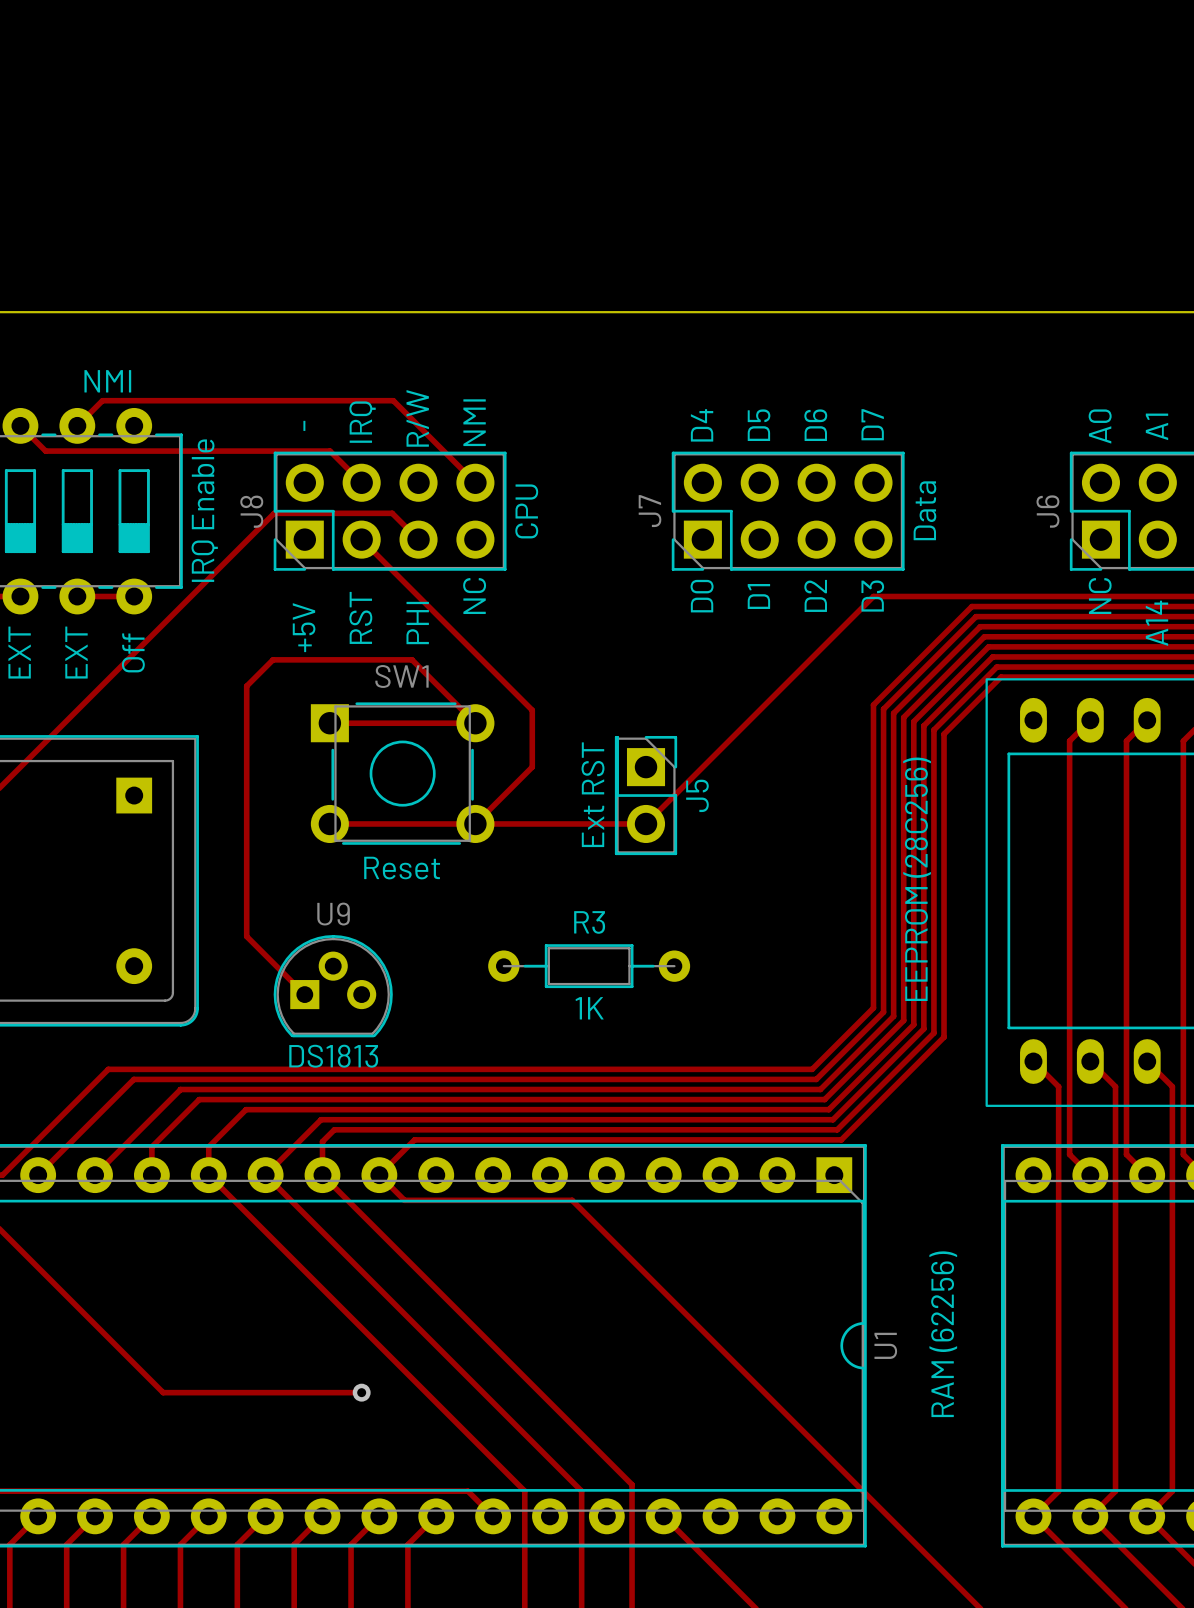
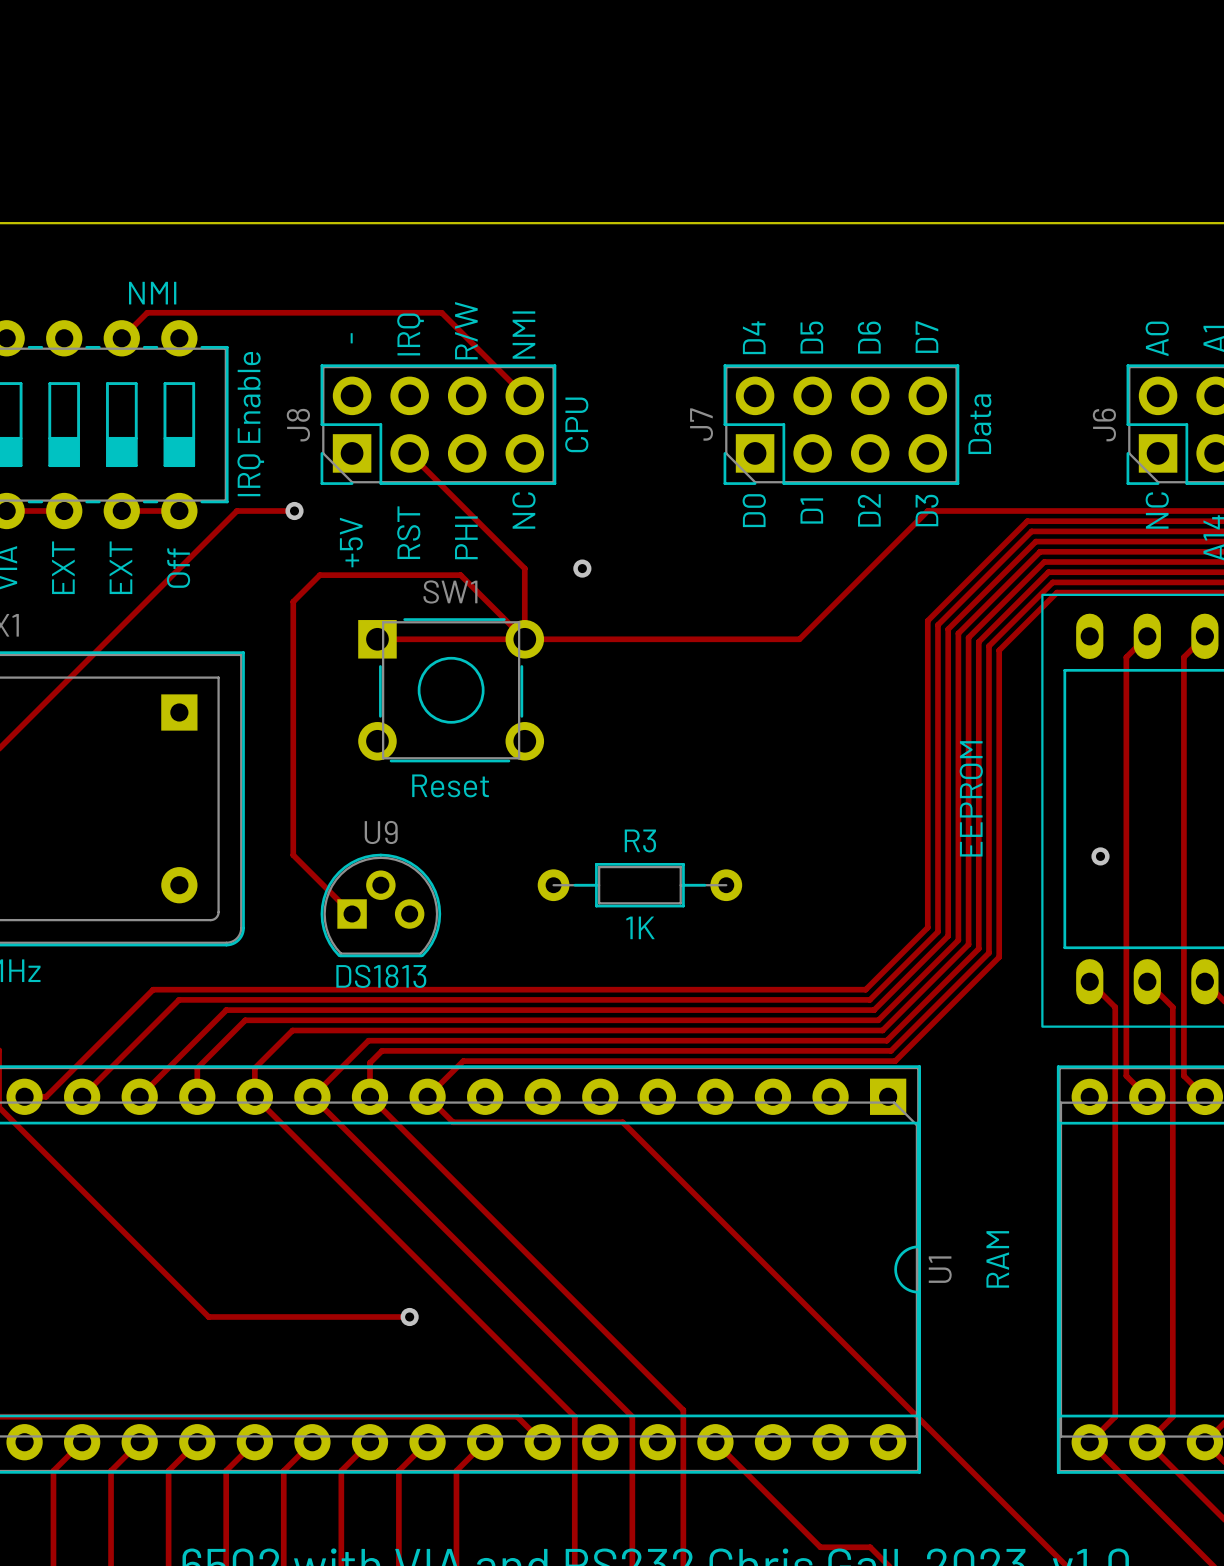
track: (20, 425) (45, 451) (329, 451) (361, 482) -> none
track: (418, 539) (392, 513) (274, 513) (191, 596) -> (294, 511) (236, 511)
via: none -> (294, 511)
track: (475, 653) (532, 710) (532, 767) (475, 823) -> none
via: none -> (582, 568)
track: (746, 723) (646, 823) (329, 823) -> (799, 639) (524, 639) (524, 568)
J5: Ext RST (646, 795) -> none
part value: EEPROM (28C256) (917, 879) -> EEPROM (971, 798)
via: none -> (1100, 856)
part value: RAM (62256) (943, 1334) -> RAM (997, 1259)

